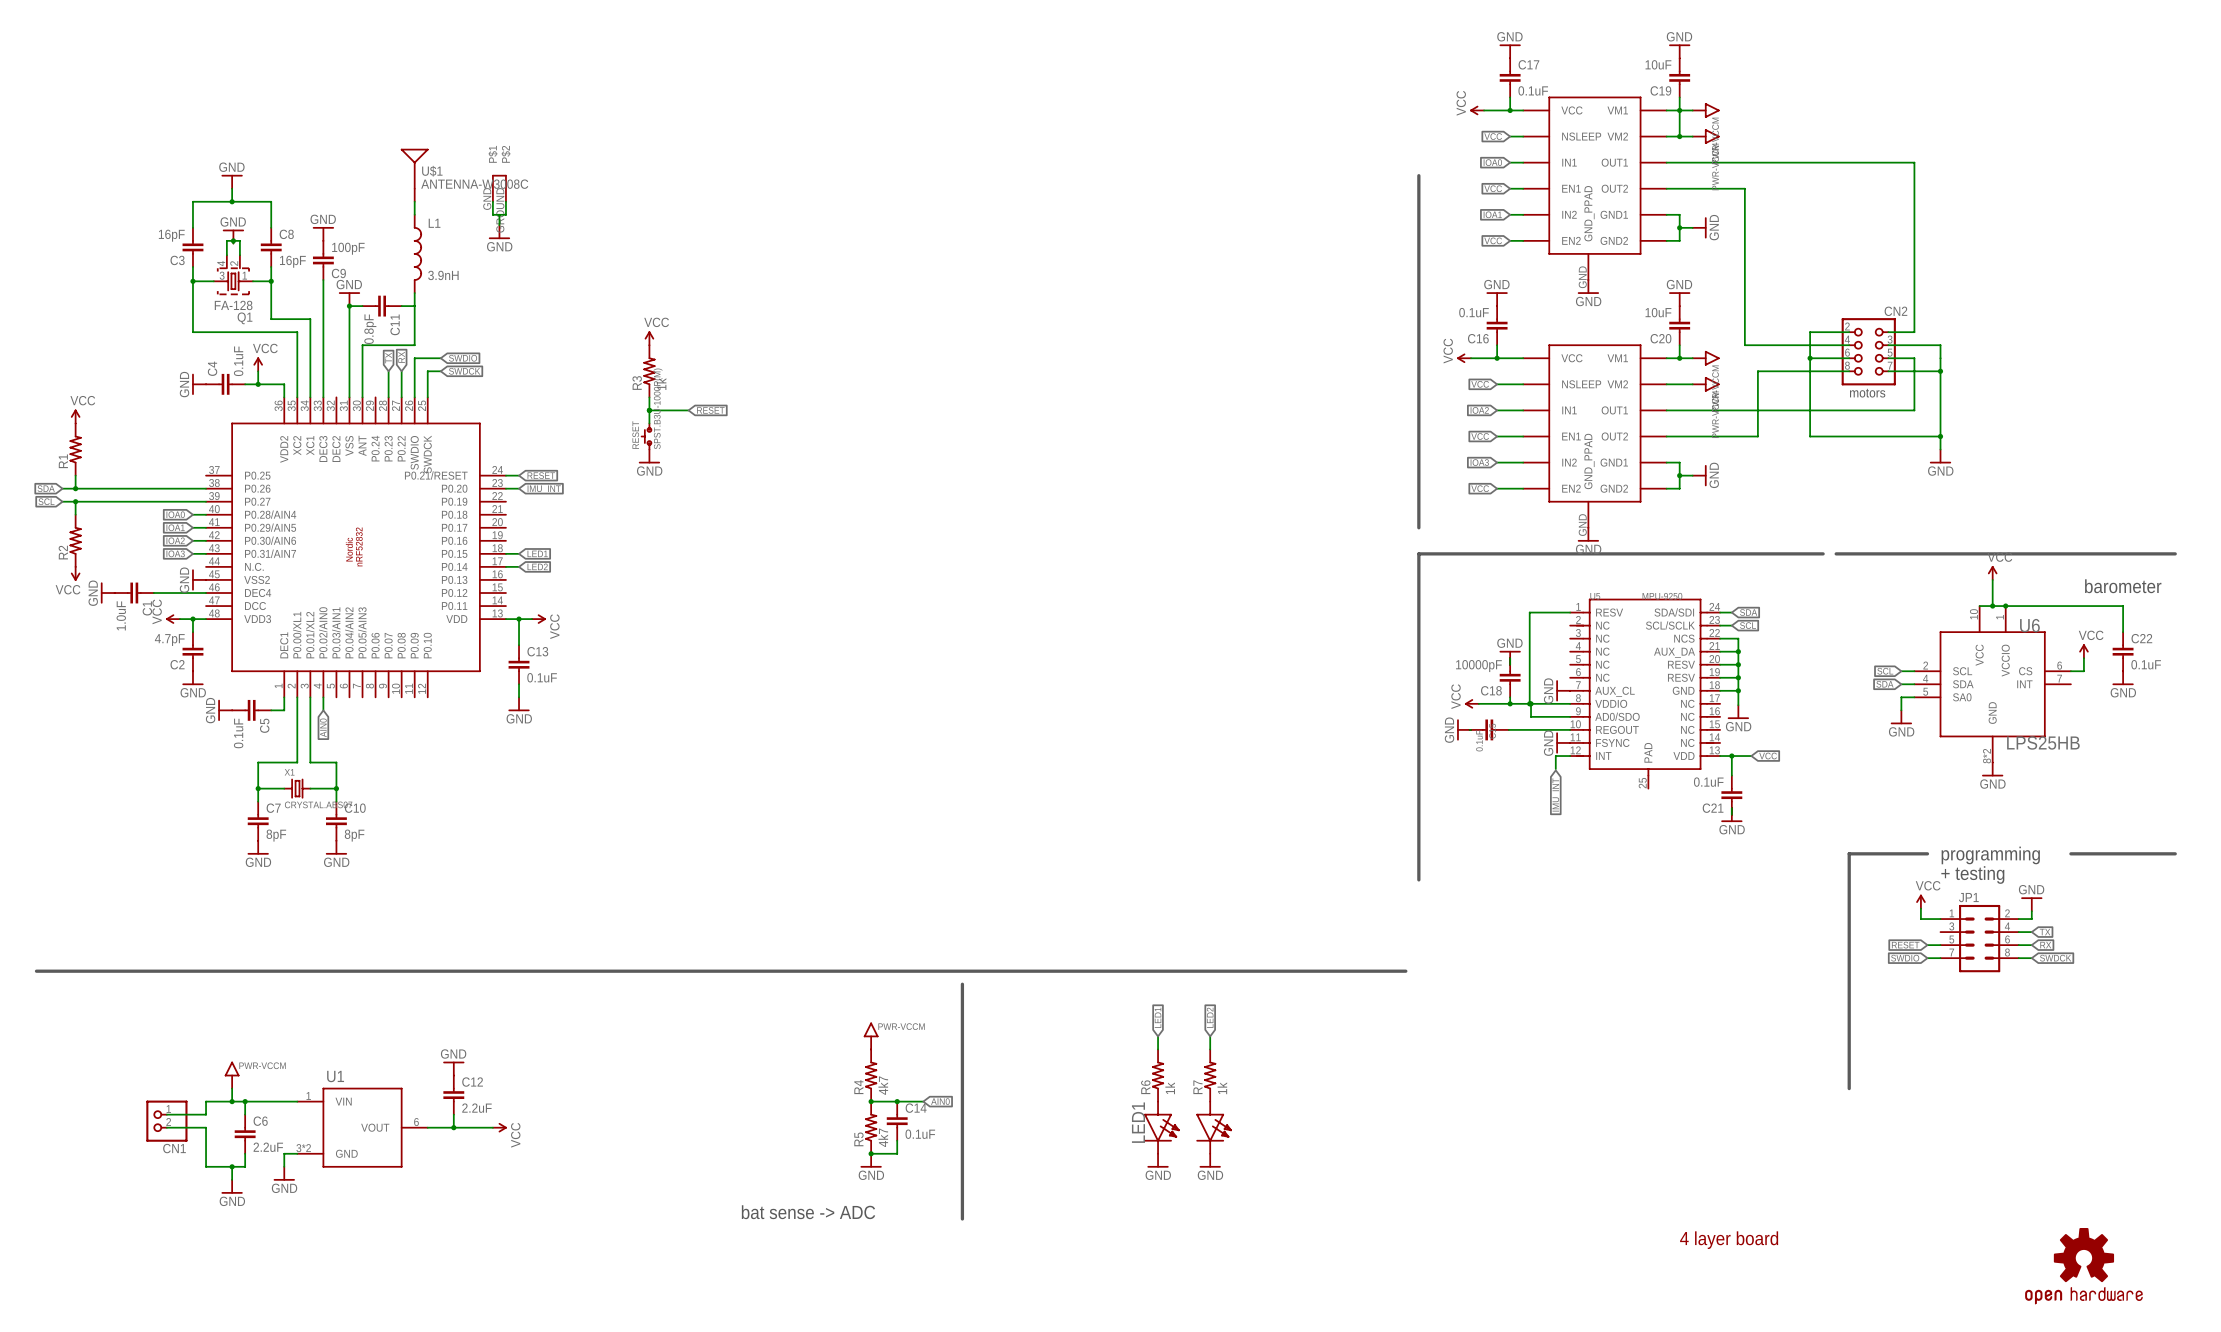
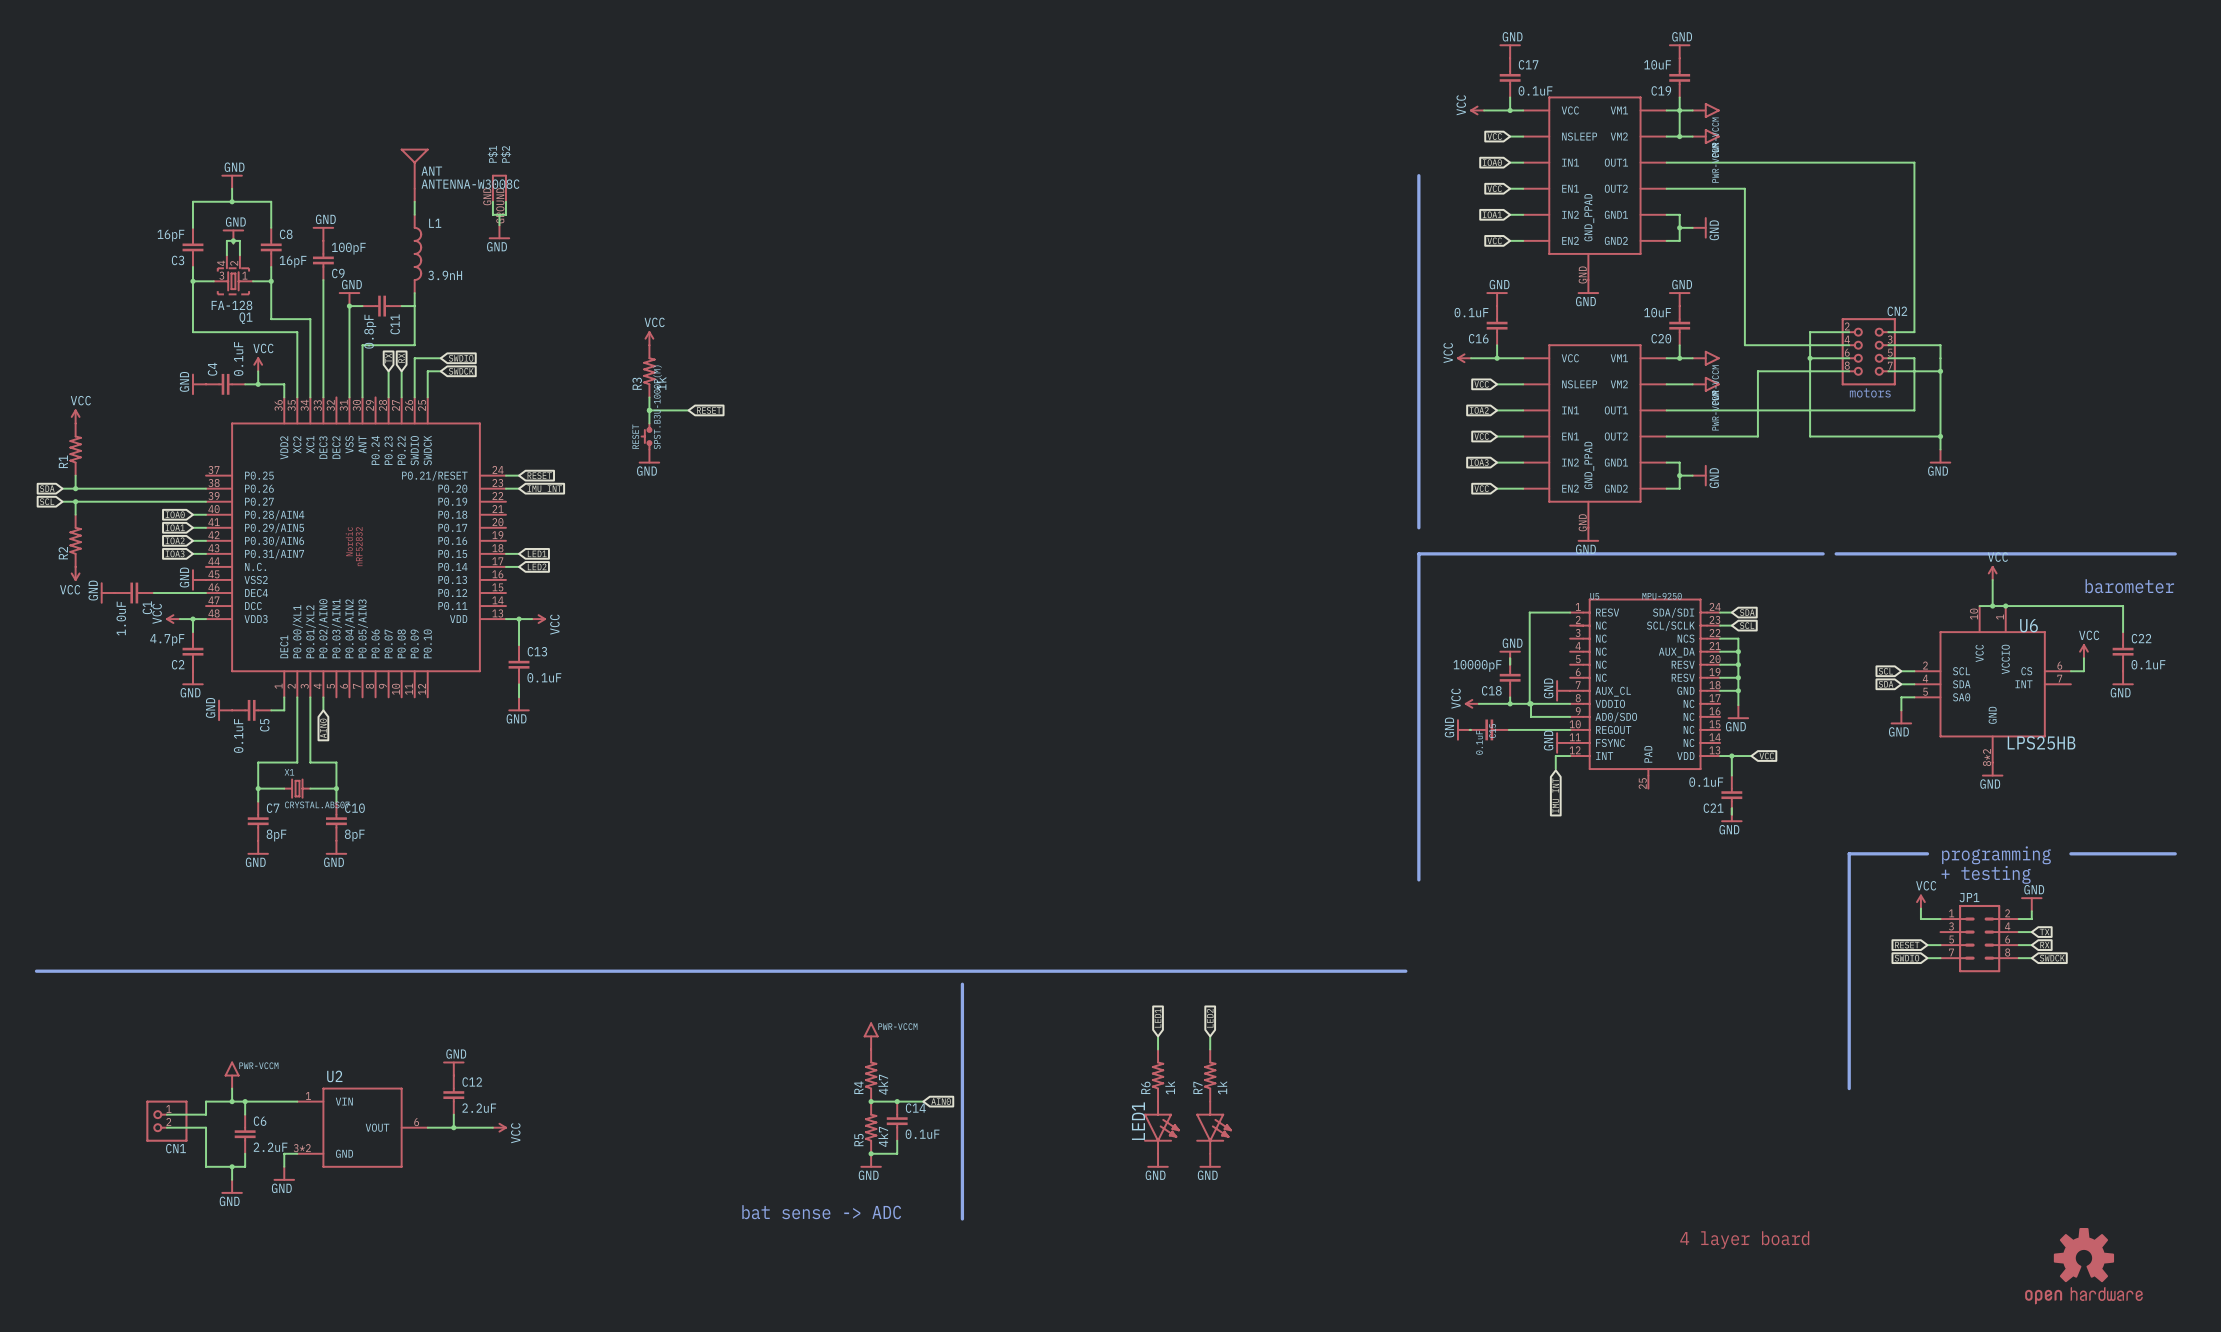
U$1 name: U$1 (432, 171) -> ANT (431, 171)
U1 name: U1 (335, 1076) -> U2 (334, 1076)

